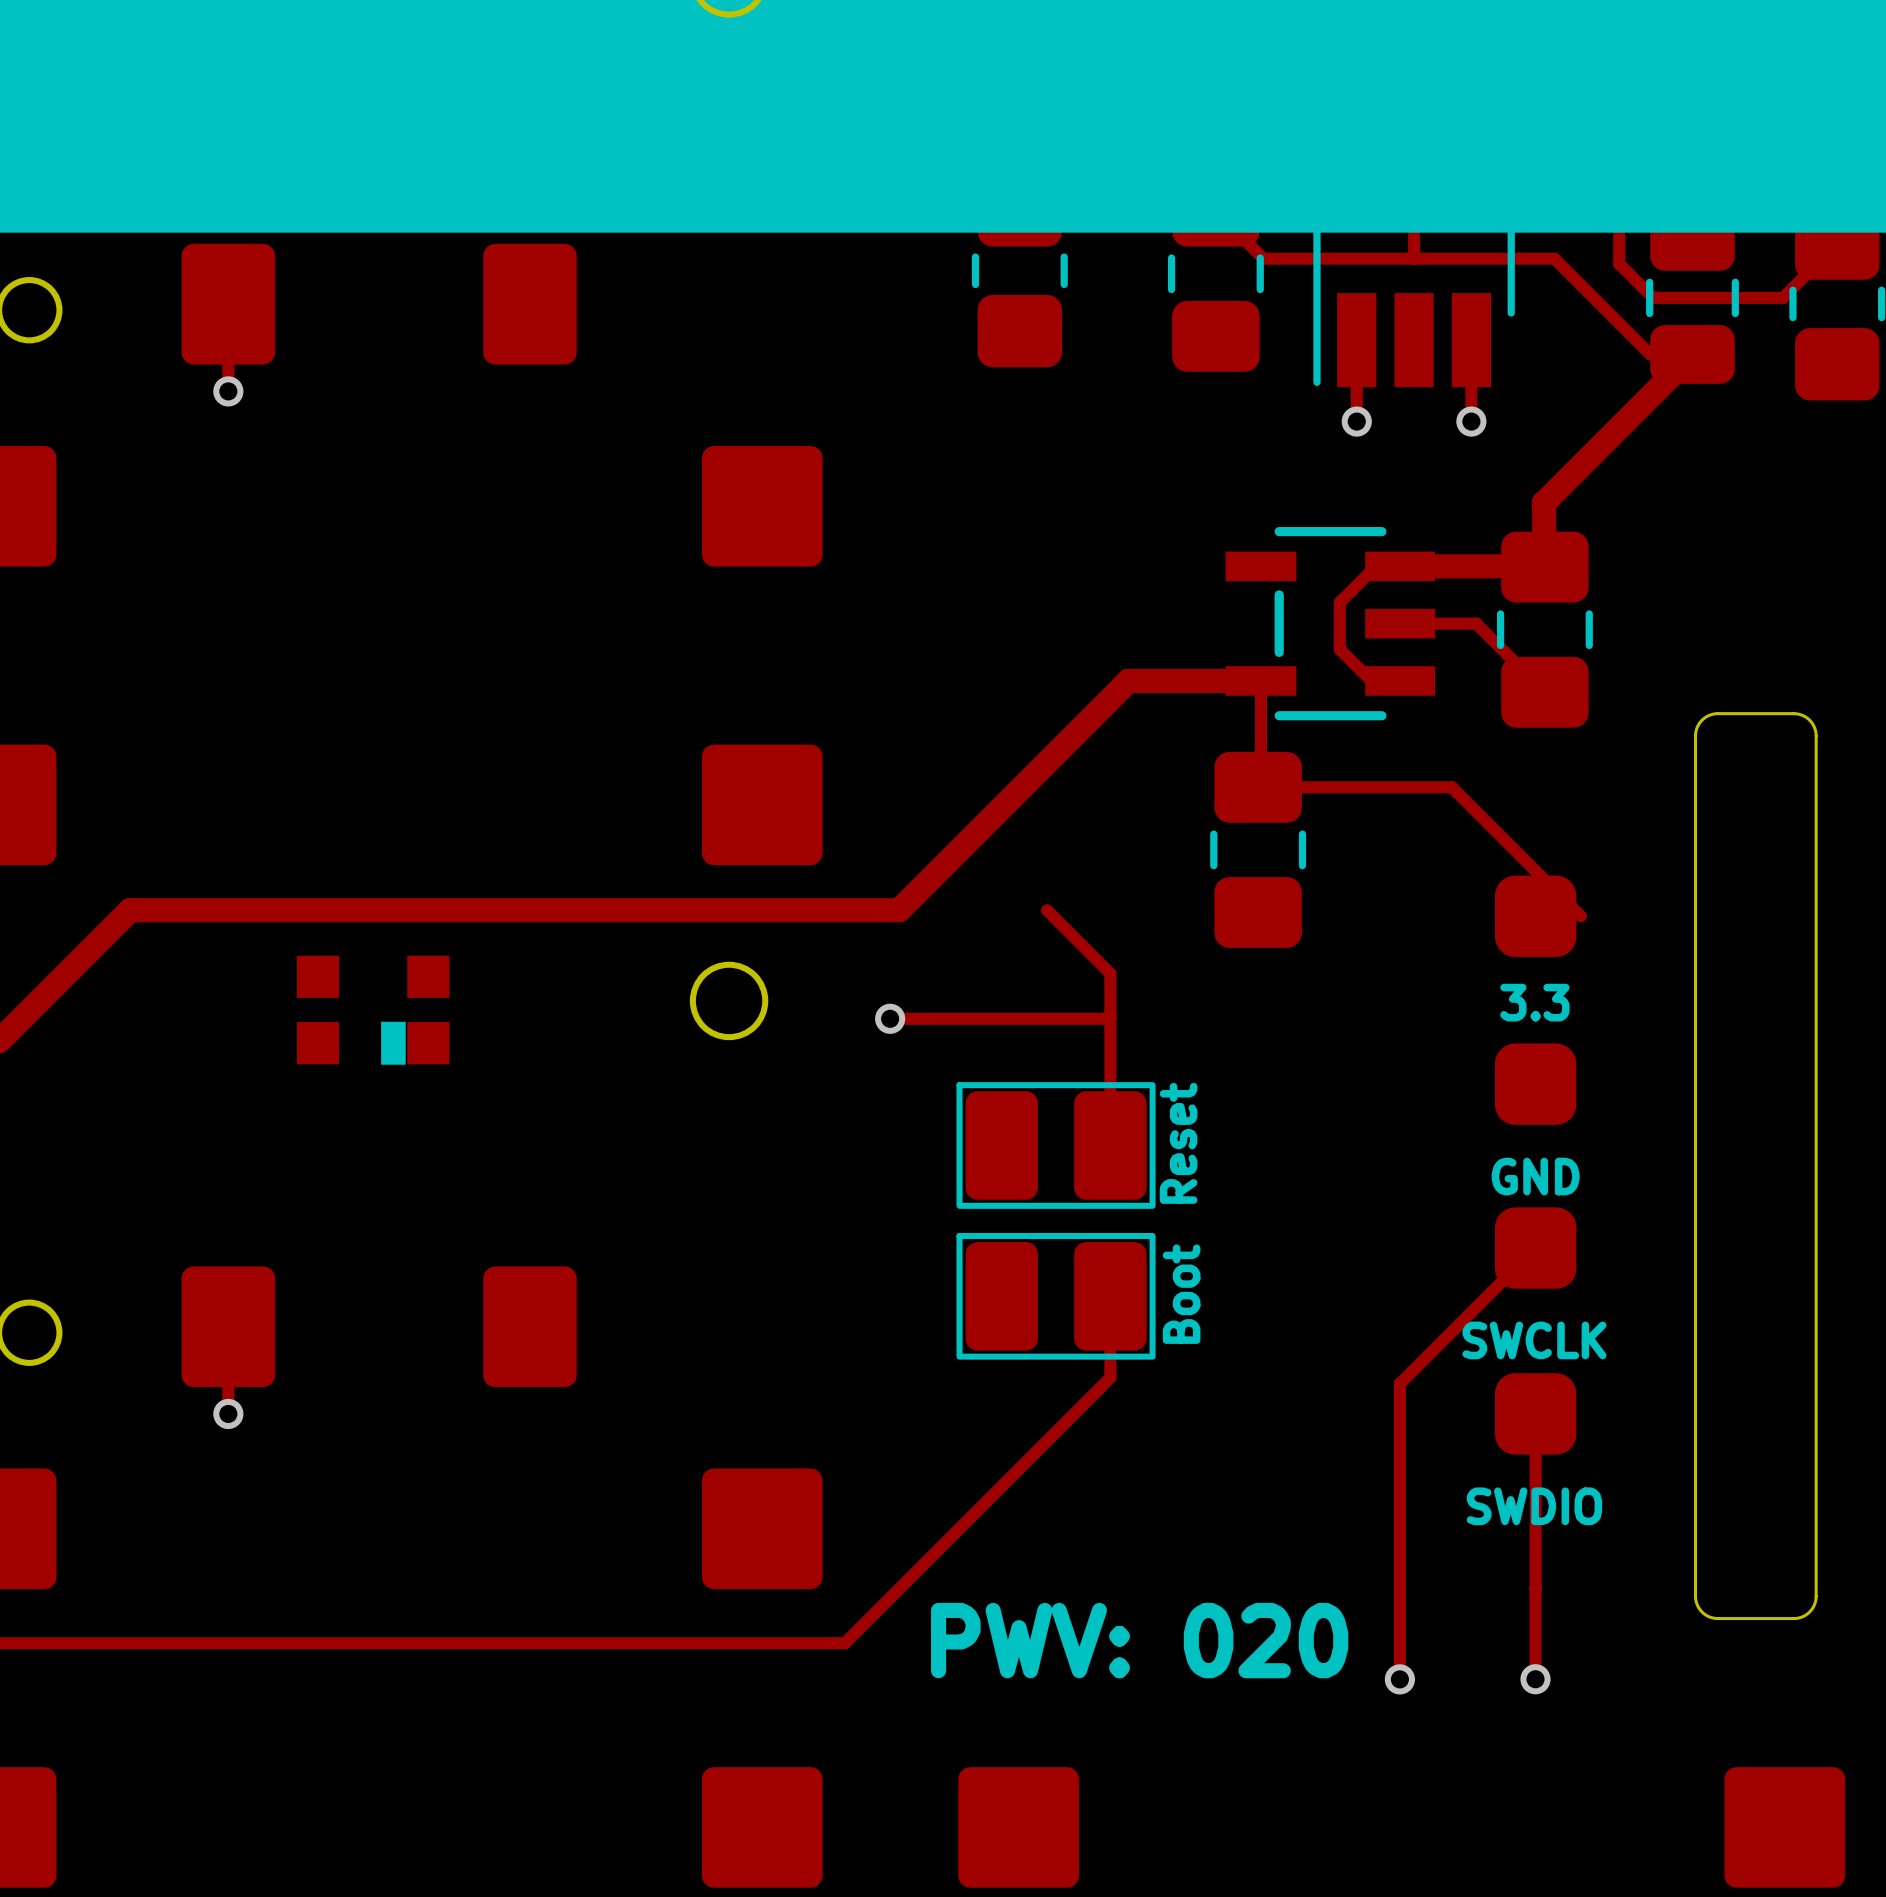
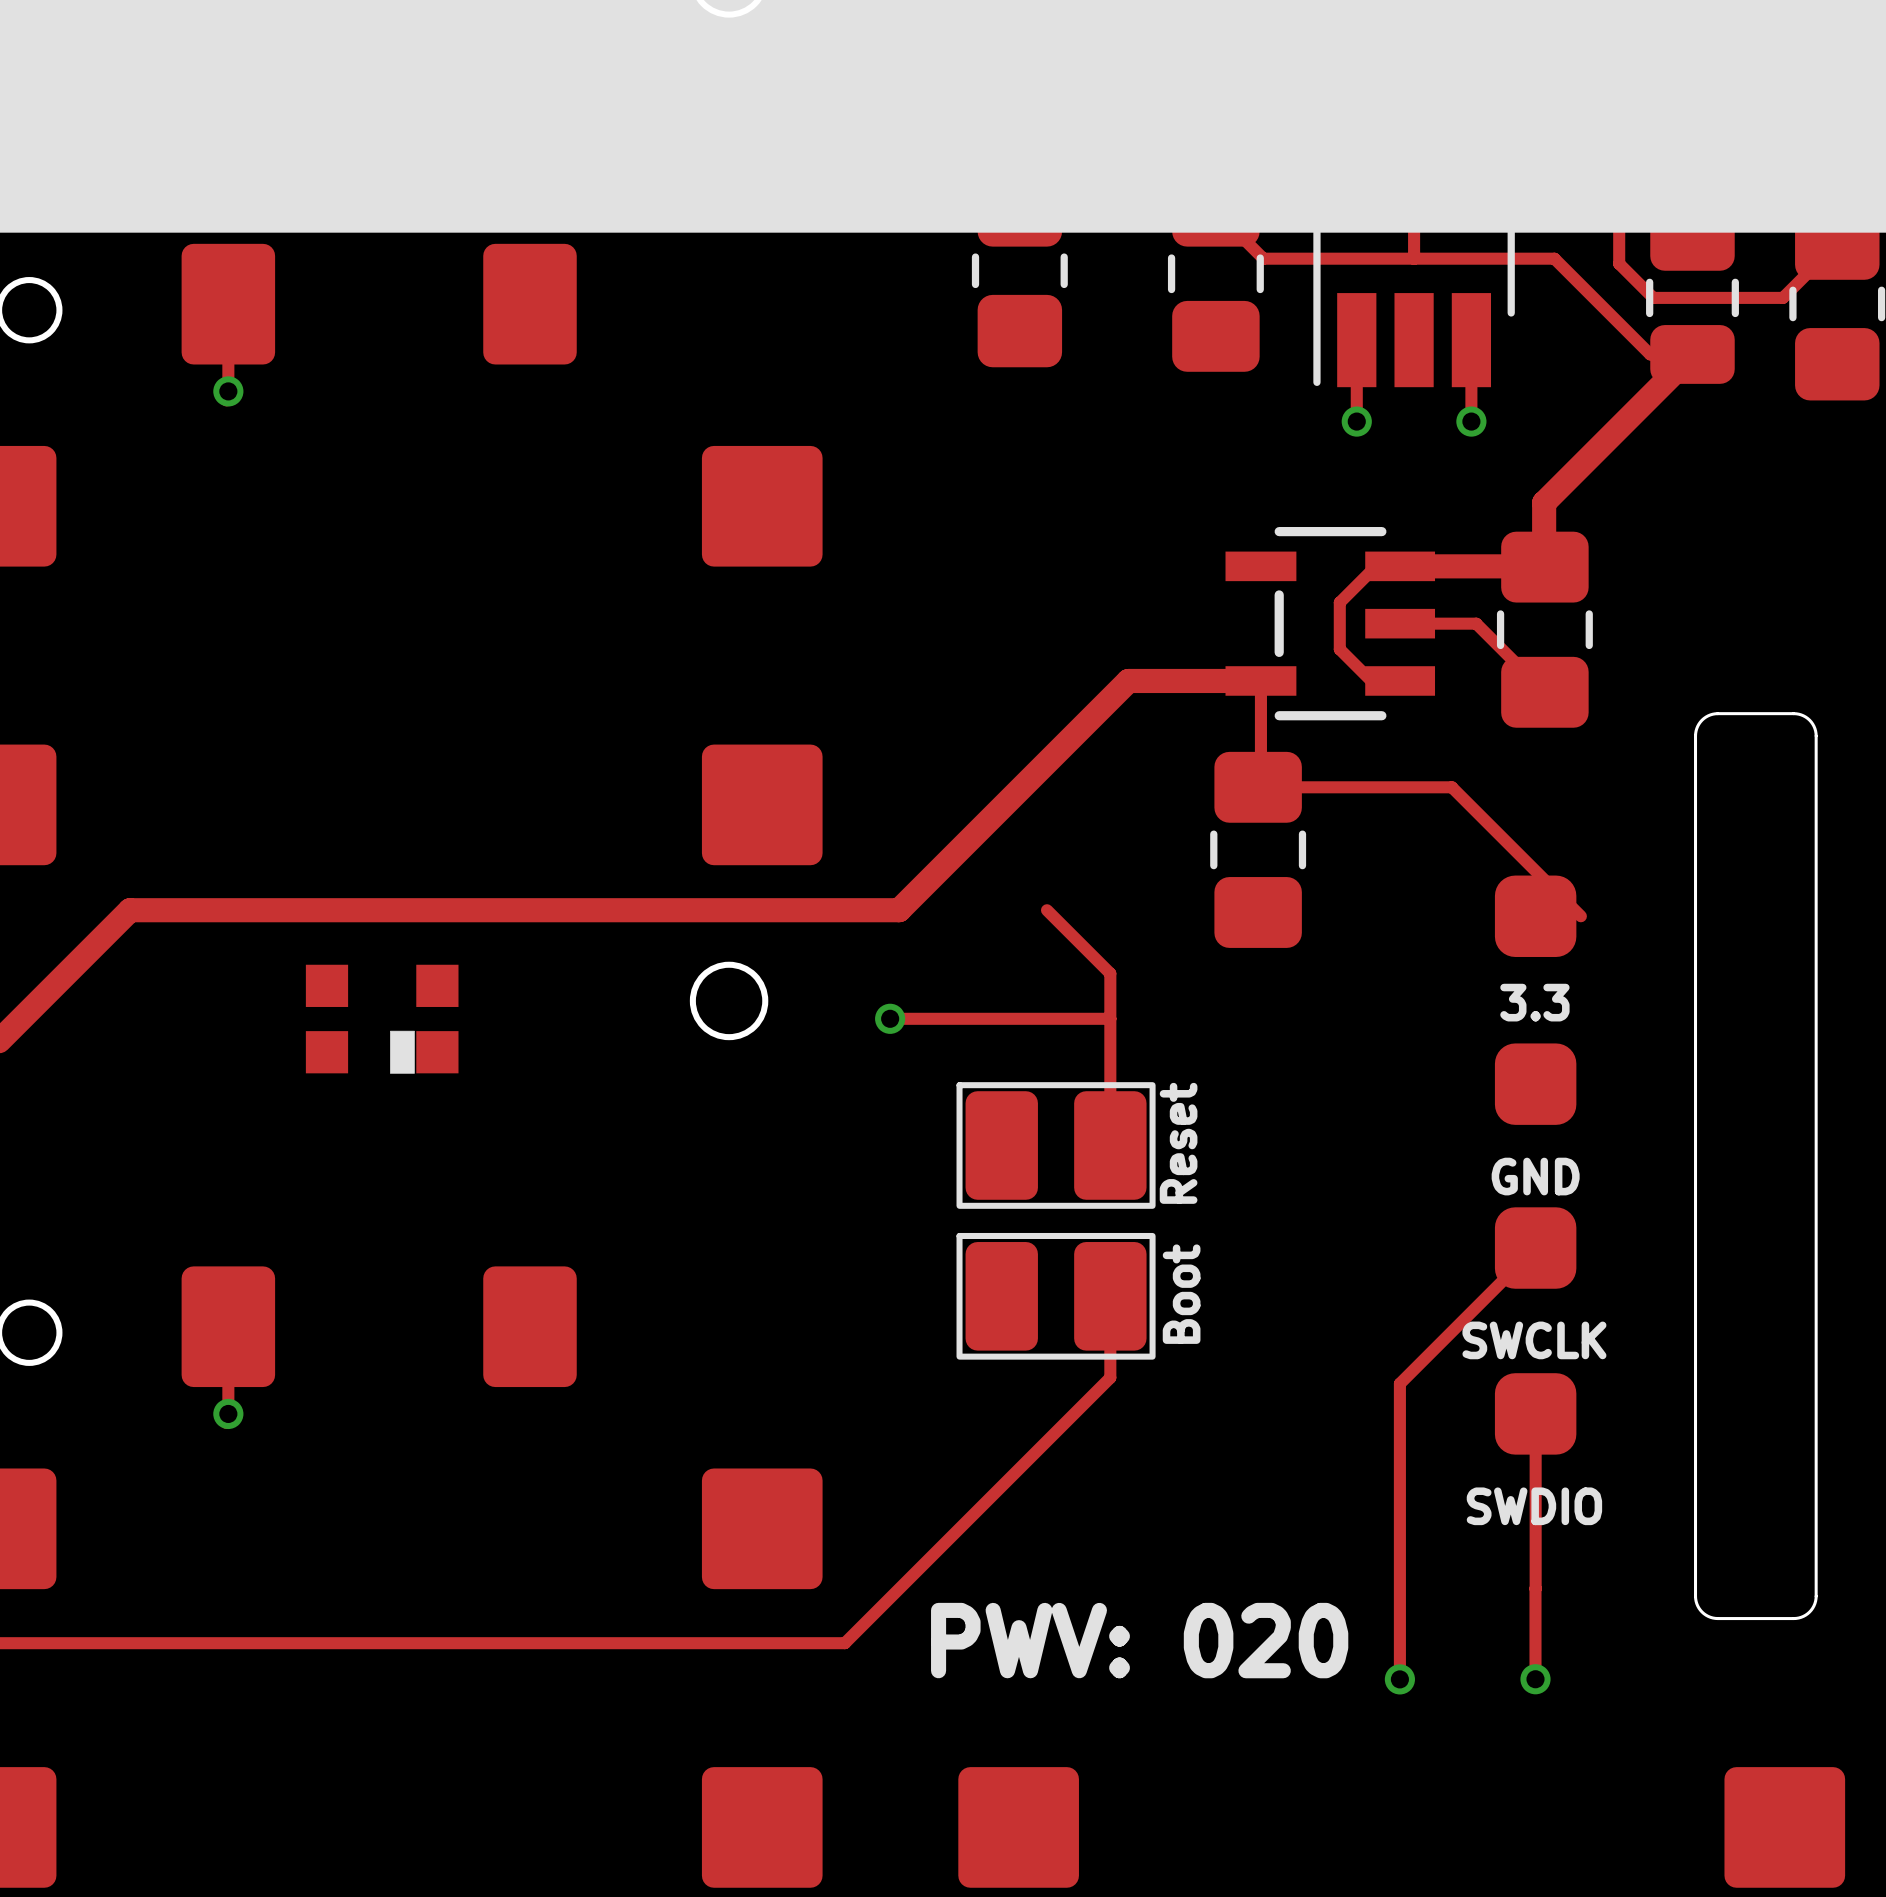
part position: (373, 1010) -> (382, 1019)

